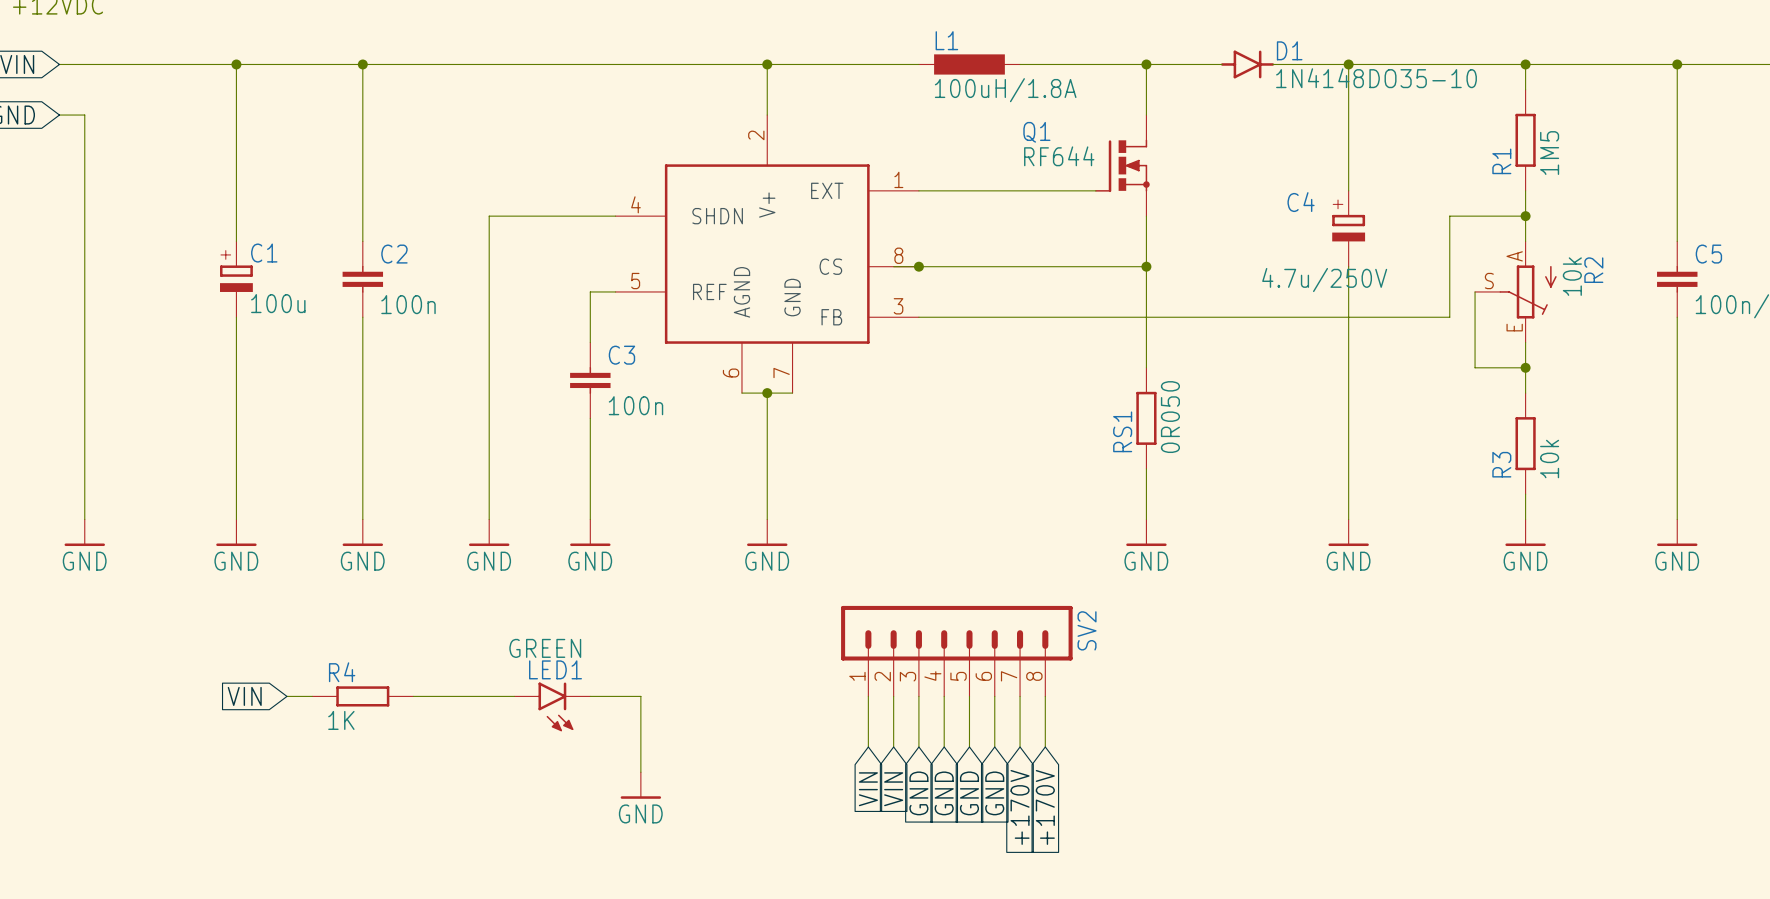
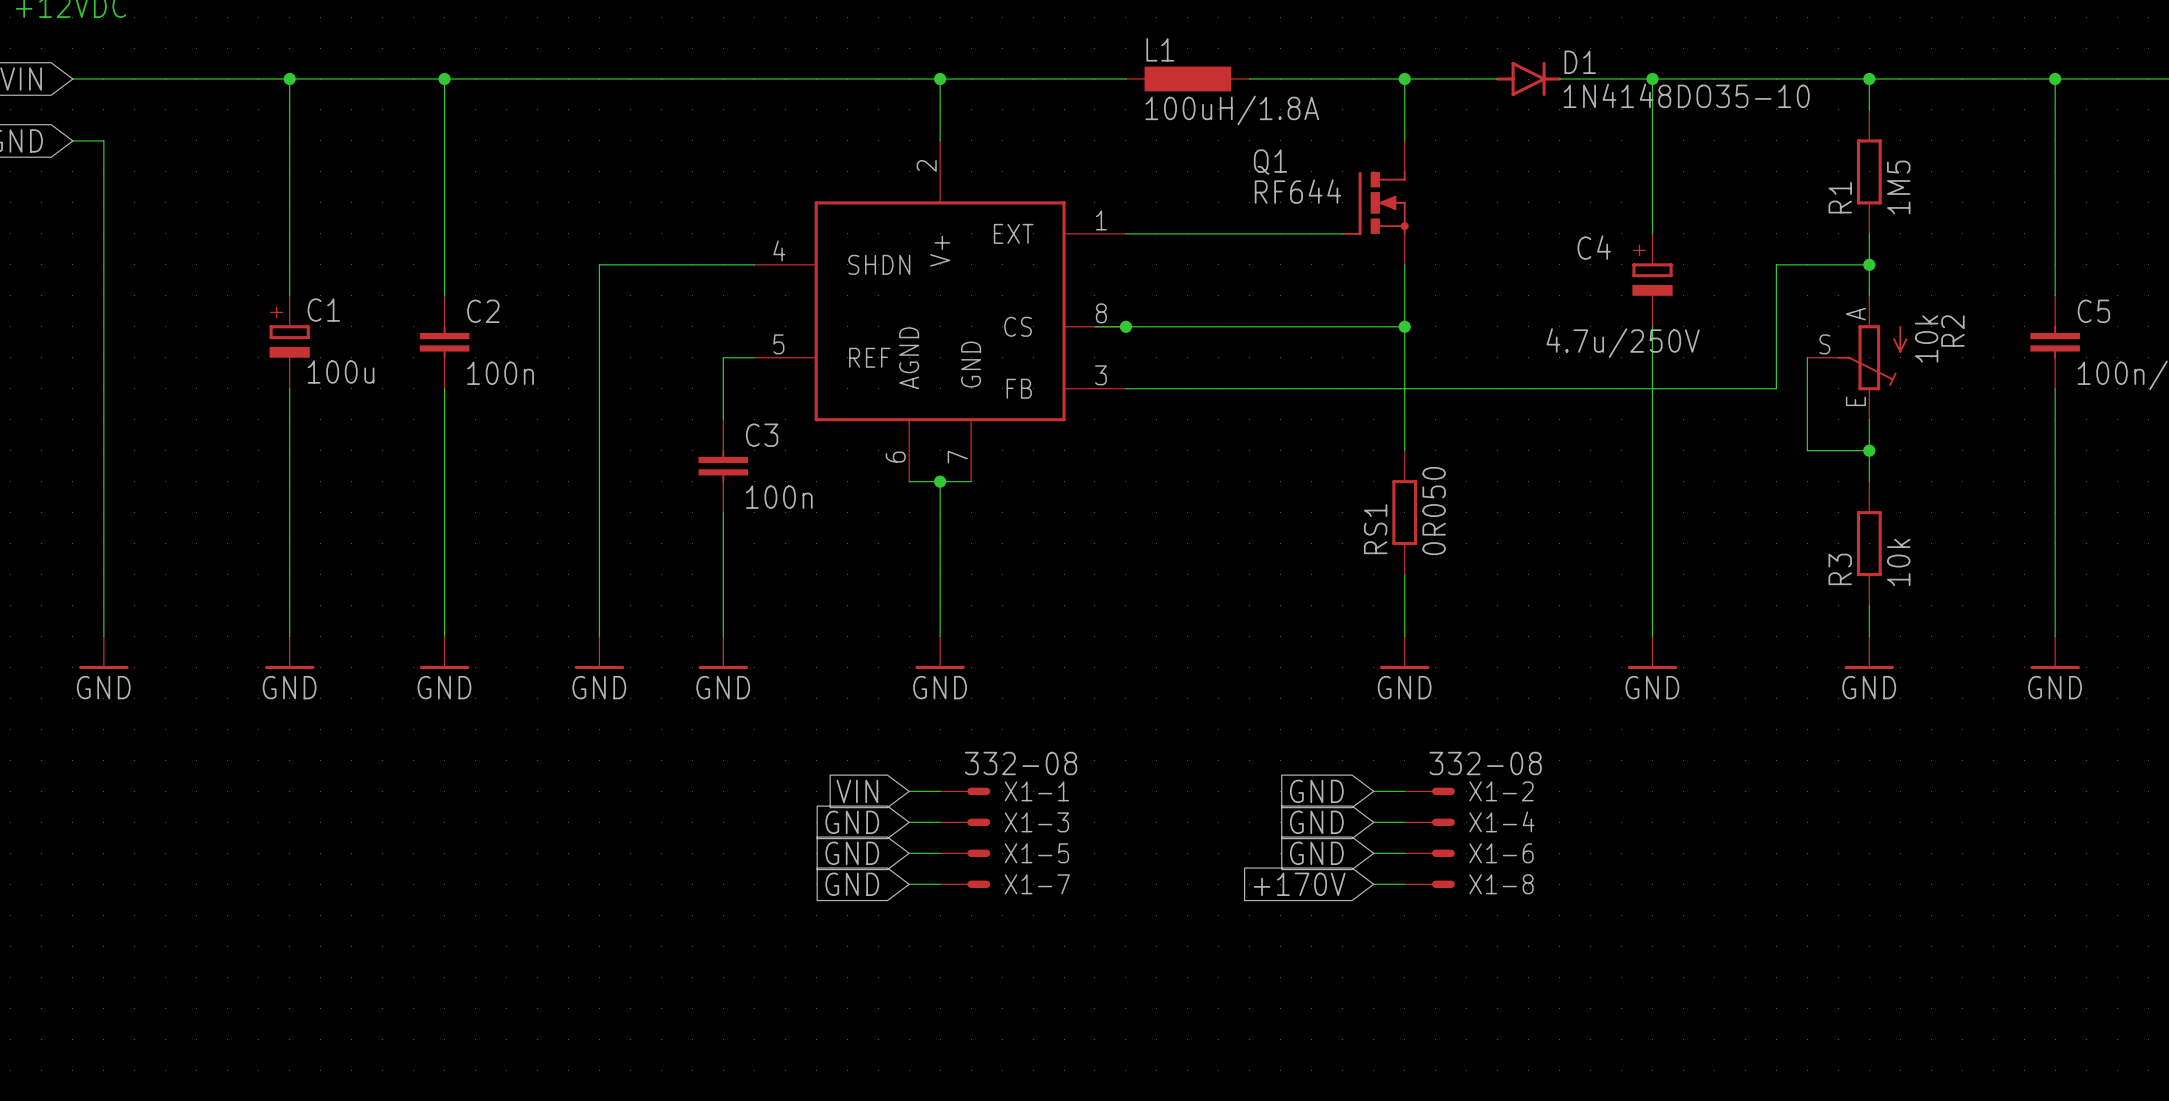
global label: none -> VIN (857, 791)
wire: none -> (909, 791) (940, 791)
X1-1: none -> 332-08 (965, 791)
global label: none -> GND (1316, 791)
wire: none -> (1373, 791) (1404, 791)
X1-2: none -> 332-08 (1429, 791)
SV2: (956, 651) -> none
global label: none -> GND (852, 822)
wire: none -> (909, 822) (940, 822)
X1-3: none -> (965, 822)
global label: none -> GND (1316, 822)
wire: none -> (1373, 822) (1404, 822)
X1-4: none -> (1429, 822)
global label: VIN (244, 696) -> none
wire: (286, 696) (312, 696) -> none
R4: 1K (362, 696) -> none
wire: (413, 696) (514, 696) -> none
wire: (590, 696) (640, 696) (640, 772) -> none
global label: none -> GND (852, 853)
wire: none -> (909, 853) (940, 853)
X1-5: none -> (965, 853)
wire: (868, 696) (868, 746) -> none
wire: (893, 696) (893, 746) -> none
wire: (918, 696) (918, 746) -> none
wire: (944, 696) (944, 746) -> none
wire: (969, 696) (969, 746) -> none
wire: (994, 696) (994, 746) -> none
wire: (1020, 696) (1020, 746) -> none
wire: (1045, 696) (1045, 746) -> none
global label: none -> GND (1316, 853)
wire: none -> (1373, 853) (1404, 853)
X1-6: none -> (1429, 853)
LED1: GREEN (552, 706) -> none
global label: none -> GND (852, 884)
wire: none -> (909, 884) (940, 884)
X1-7: none -> (965, 884)
global label: none -> +170V (1299, 884)
wire: none -> (1373, 884) (1404, 884)
X1-8: none -> (1429, 884)
power symbol: GND (640, 785) -> none
global label: VIN (868, 789) -> none
global label: VIN (893, 789) -> none
global label: GND (918, 793) -> none
global label: GND (944, 793) -> none
global label: GND (969, 793) -> none
global label: GND (994, 793) -> none
global label: +170V (1020, 807) -> none
global label: +170V (1045, 807) -> none

